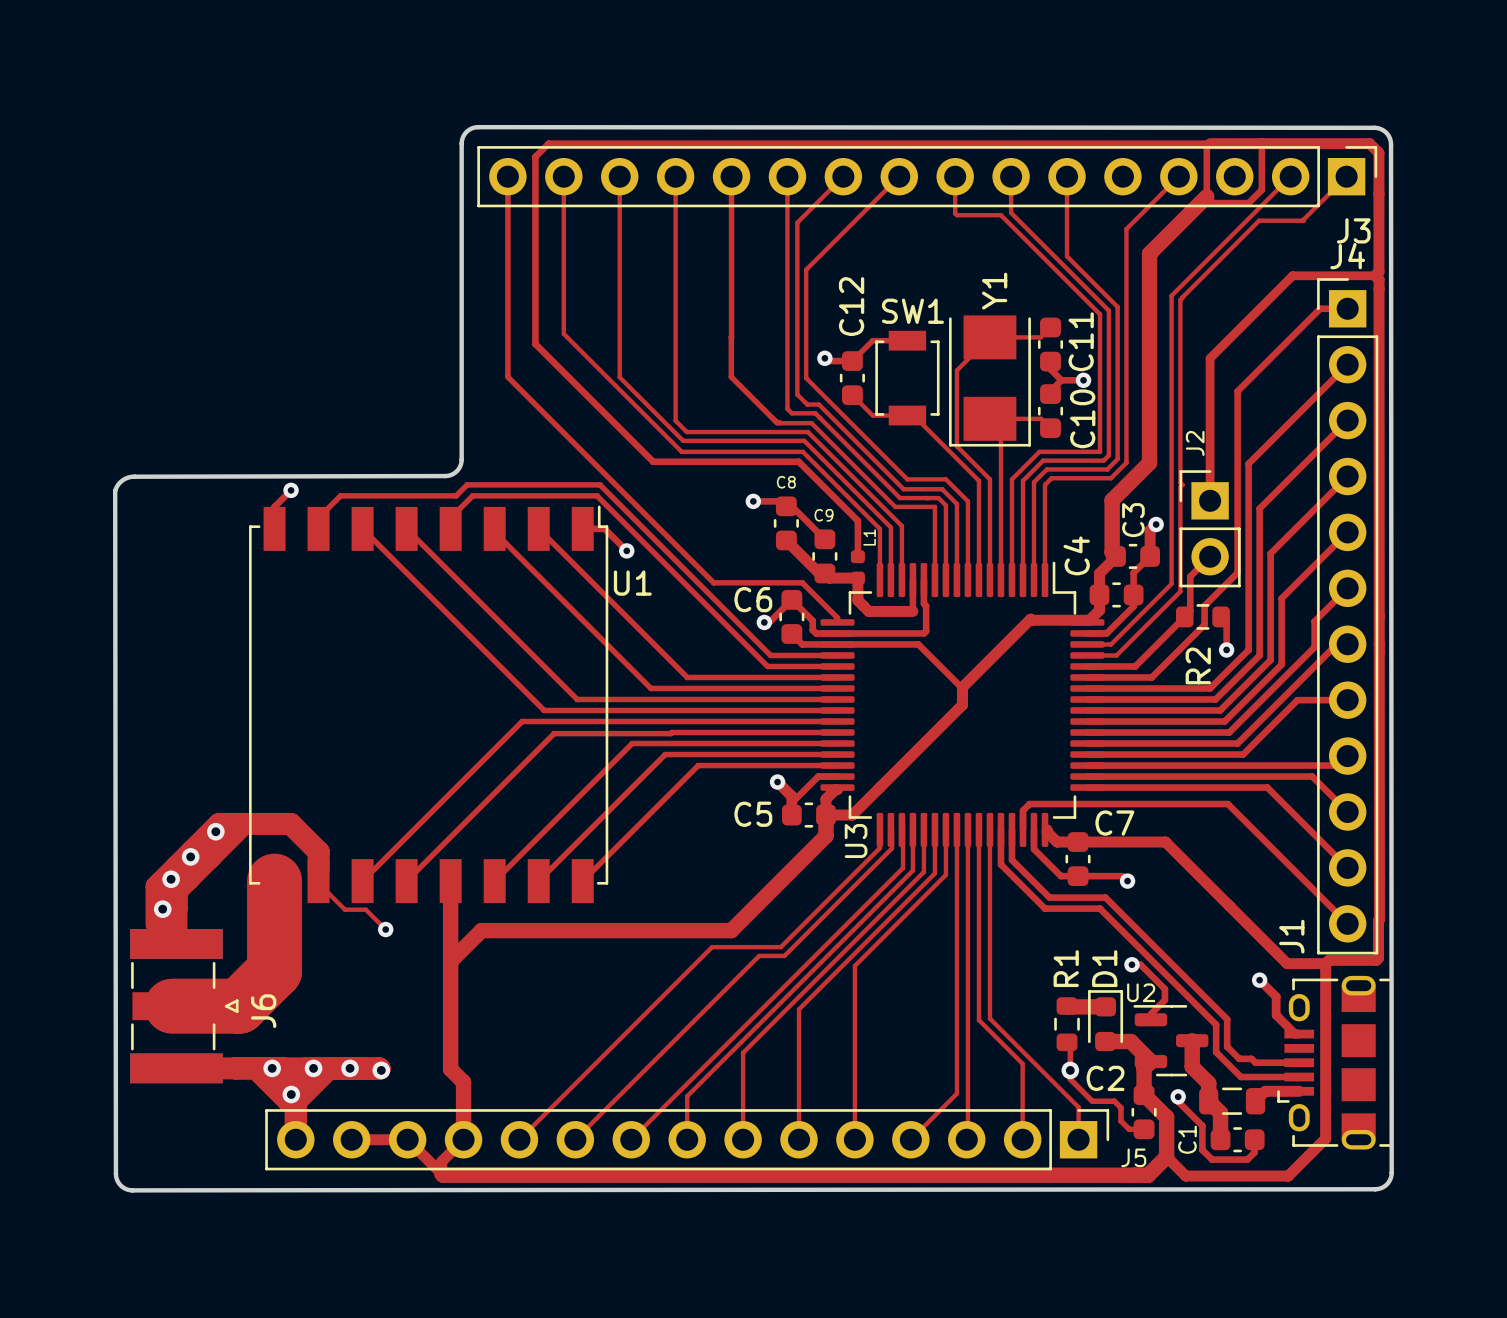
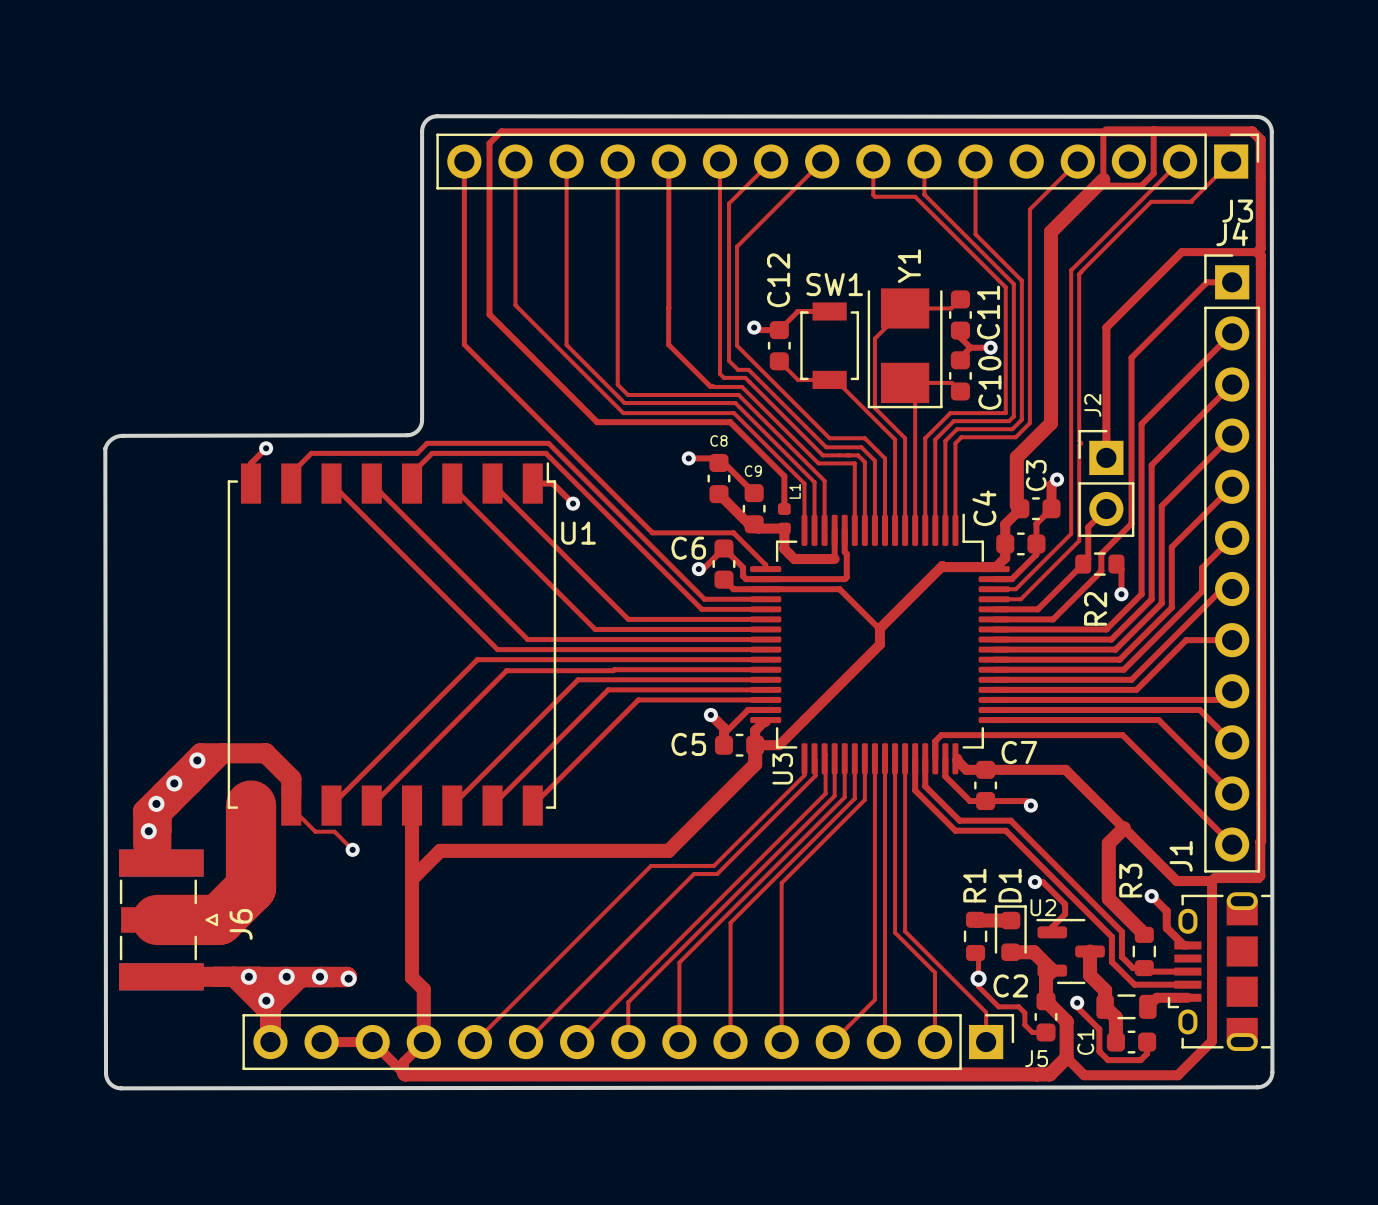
top track: none -> (1123, 828) (1108, 843) (1108, 898) (1144, 934)
R3: none -> (1144, 951)

